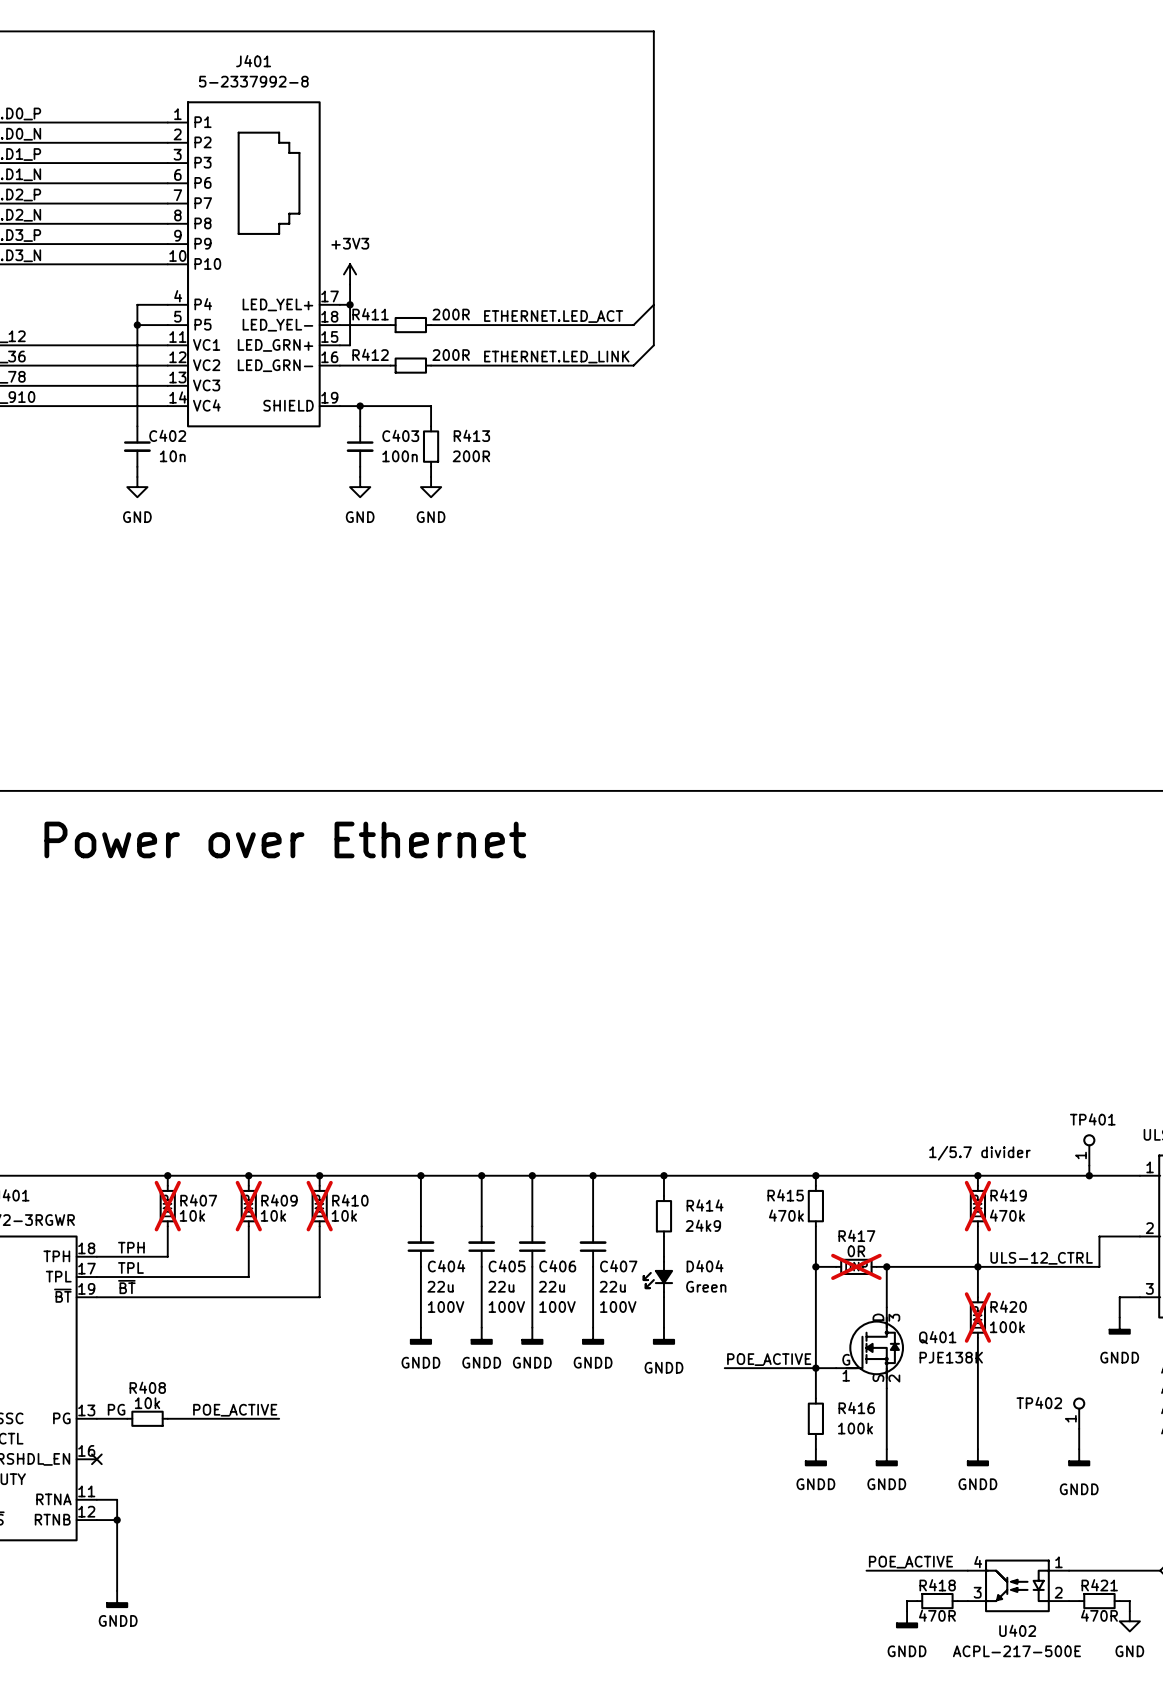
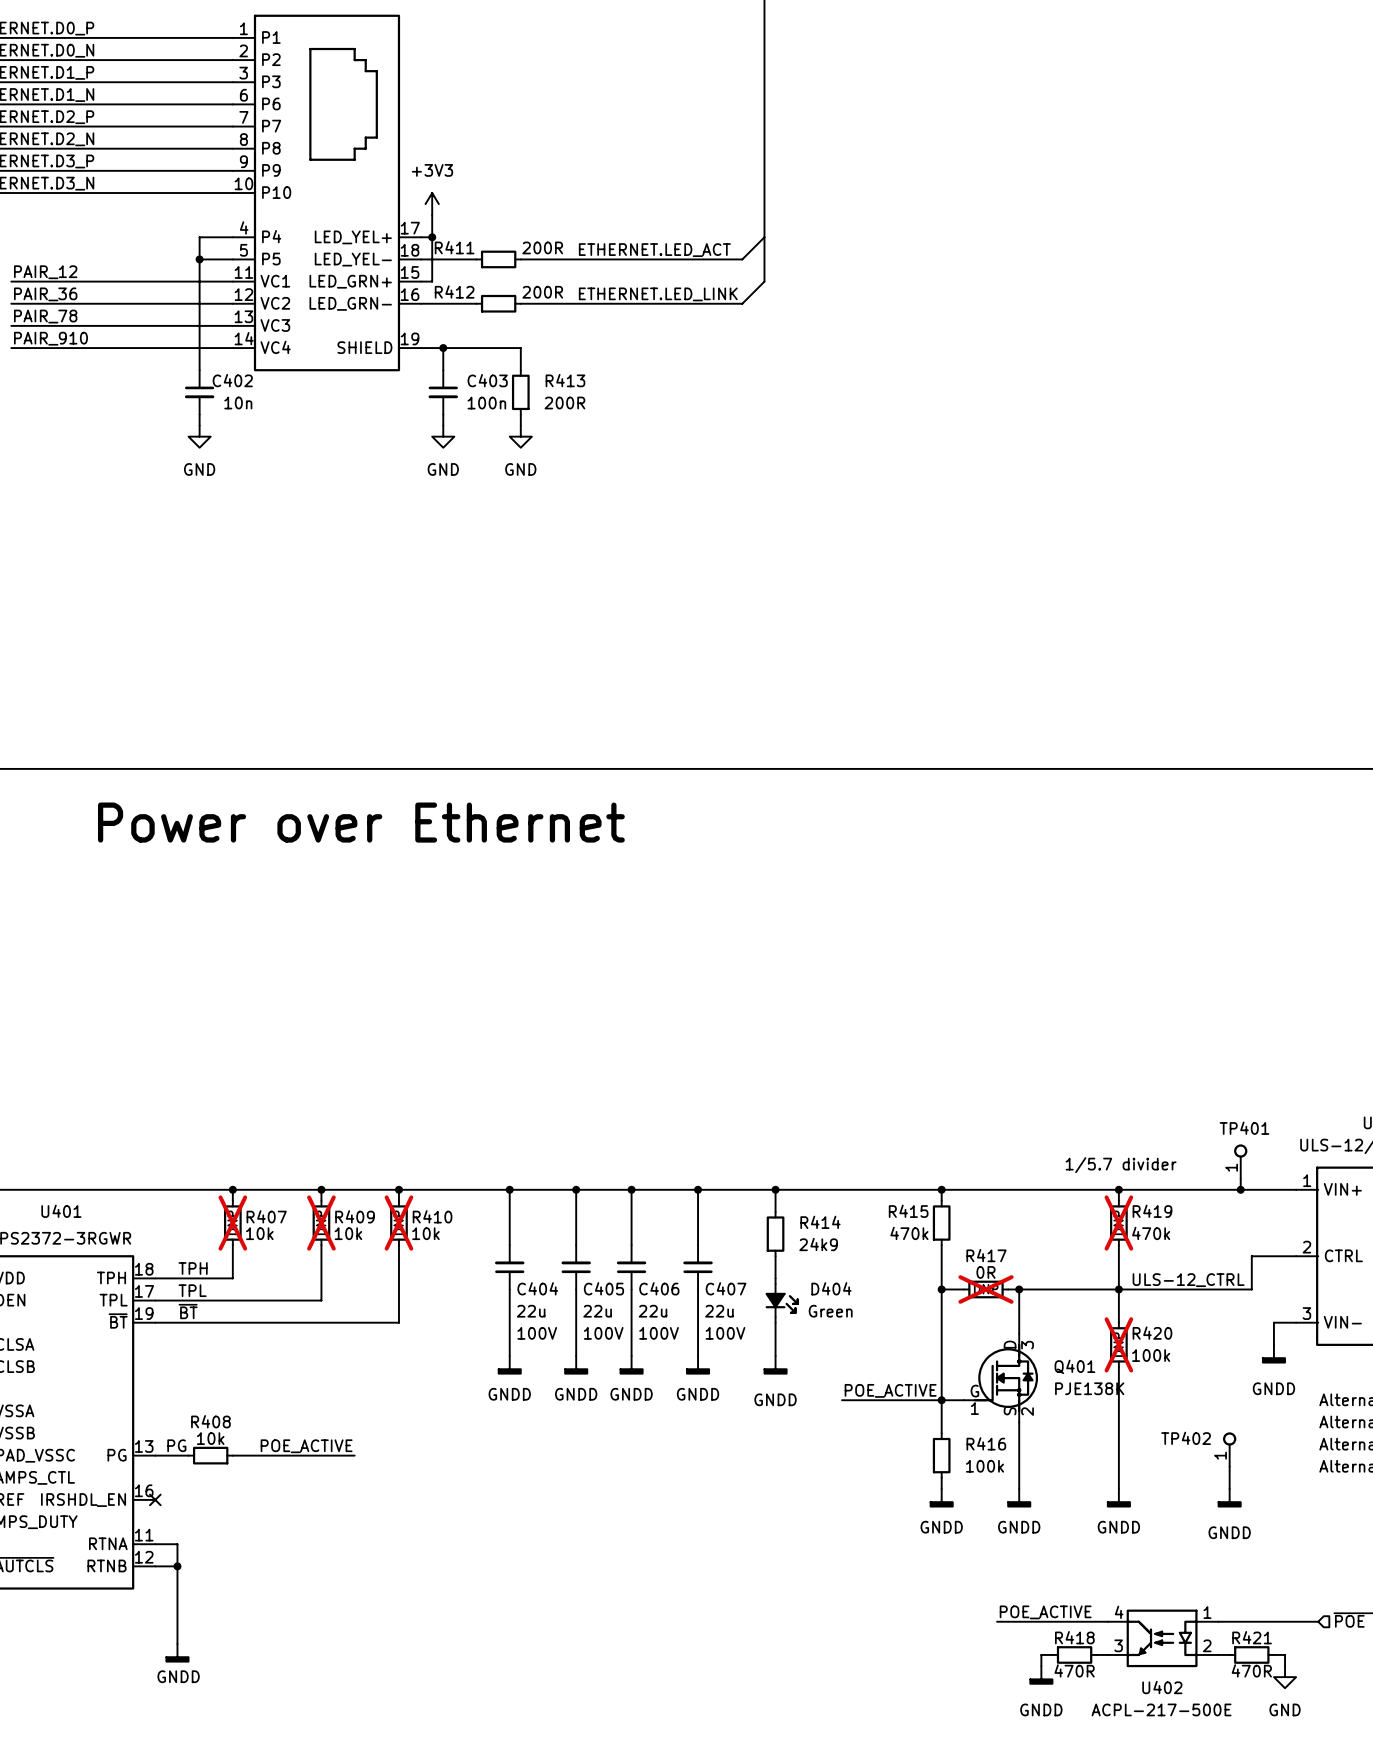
D404 flip: as is (657, 1277) -> left-right (782, 1300)

